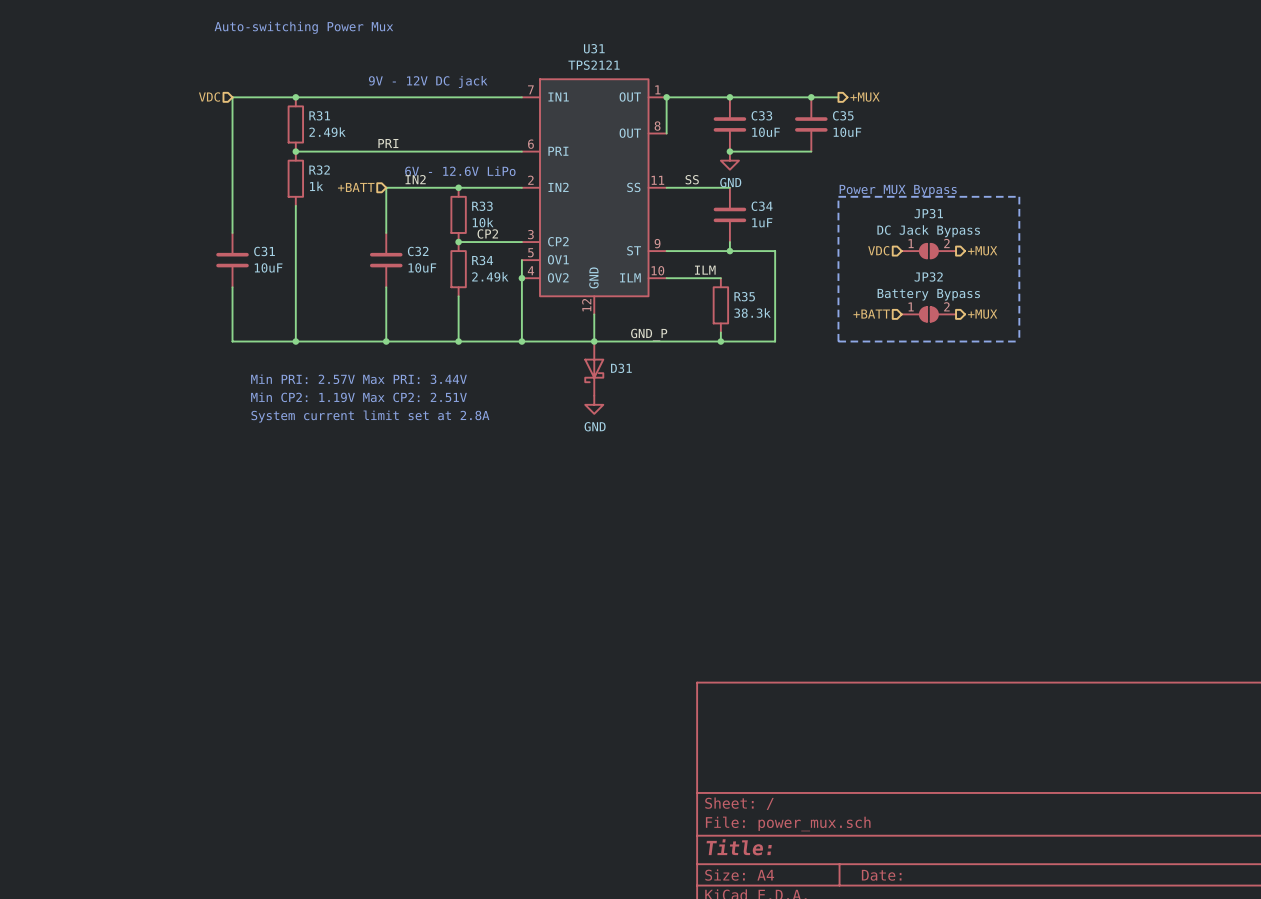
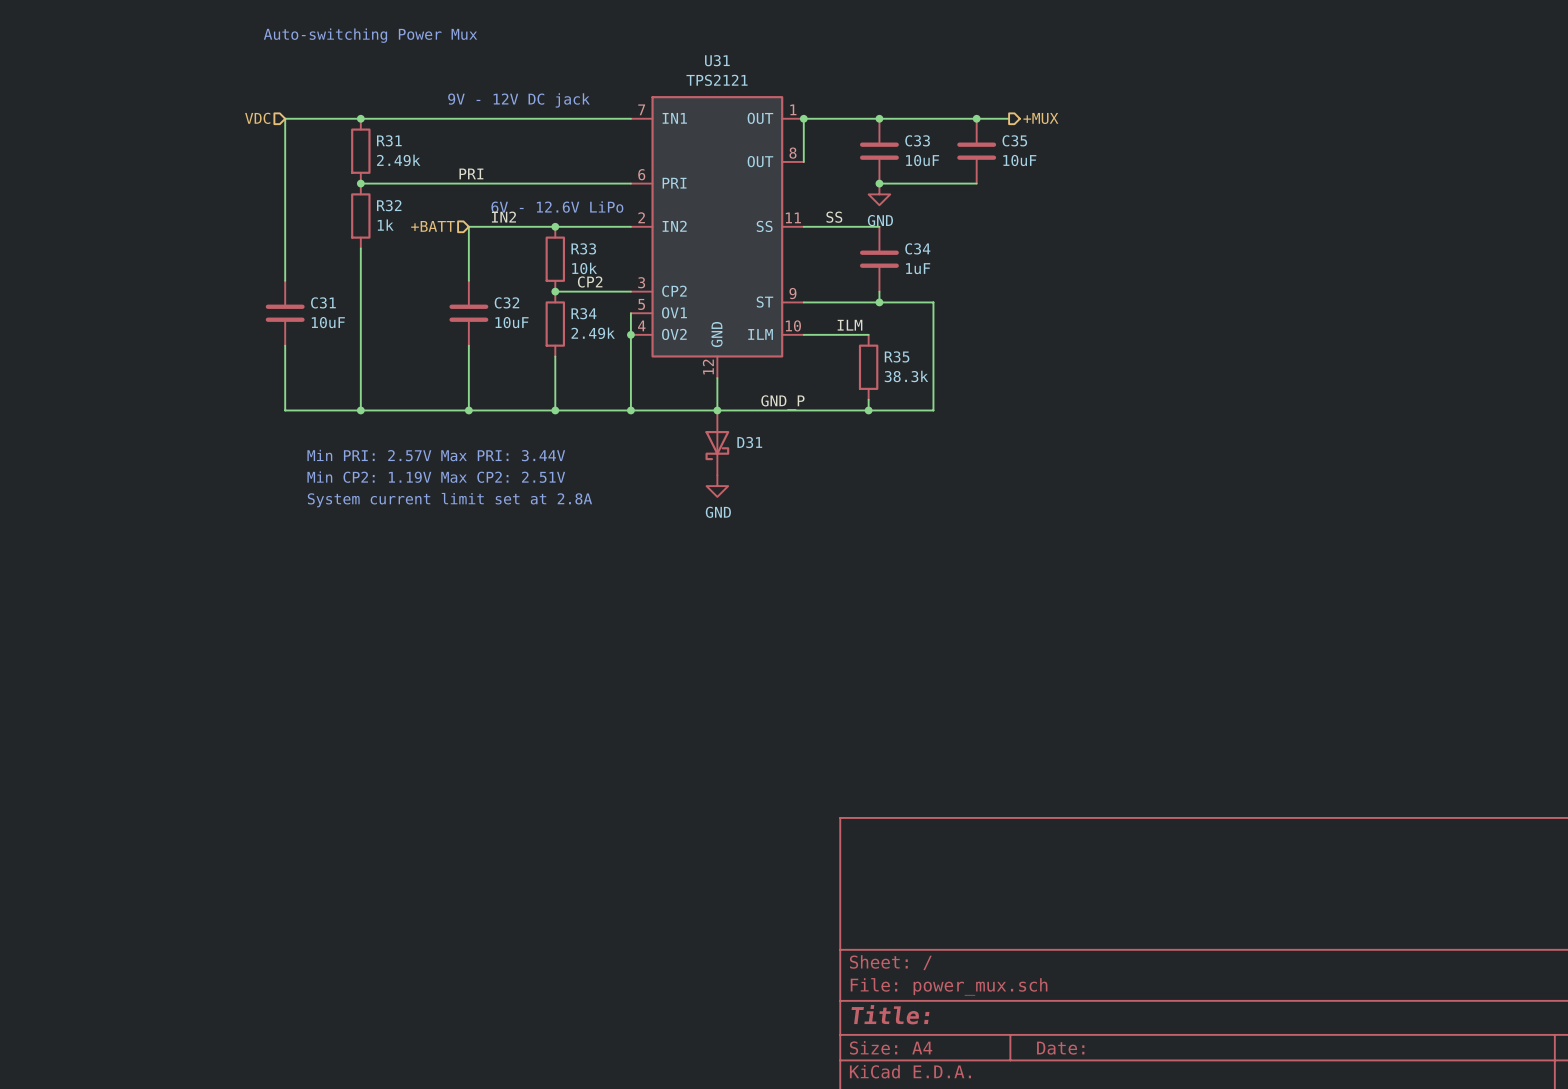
text: Power MUX Bypass (898, 190) -> none
line: (838, 196) (838, 341) (1019, 341) (1019, 196) (838, 196) -> none
hierarchical label: VDC (878, 250) -> none
hierarchical label: +MUX (982, 250) -> none
JP31: DC Jack Bypass (928, 251) -> none
hierarchical label: +BATT (871, 314) -> none
JP32: Battery Bypass (928, 314) -> none
hierarchical label: +MUX (982, 314) -> none

